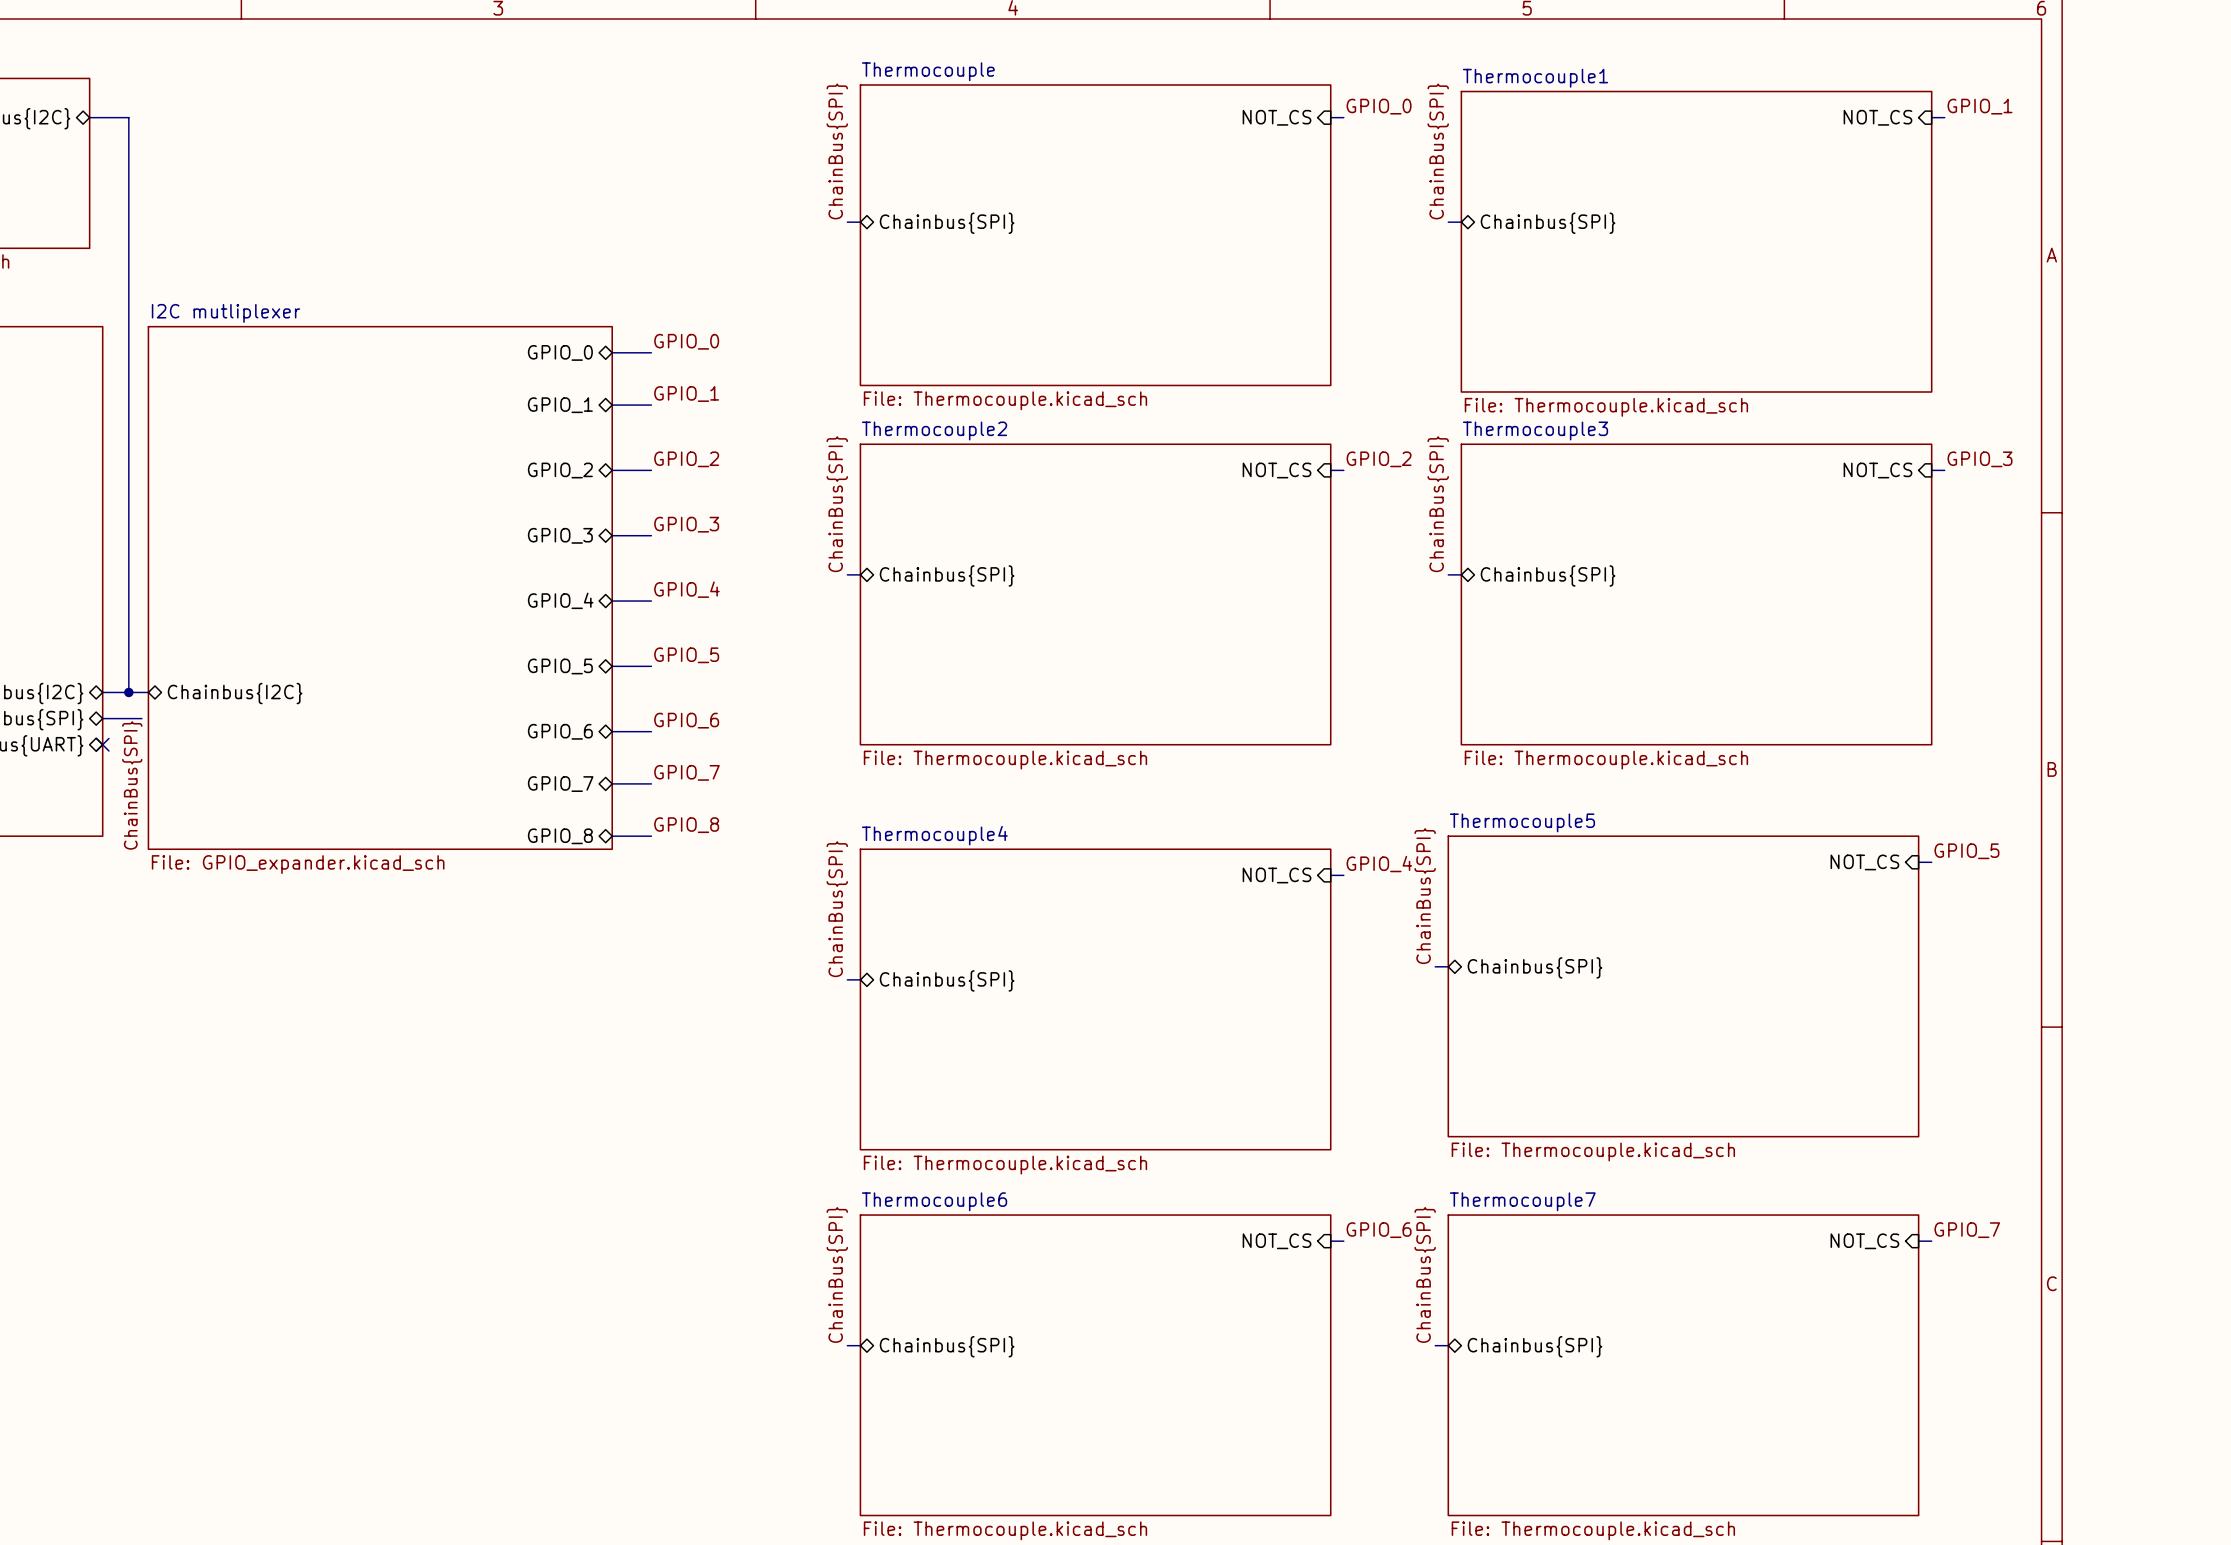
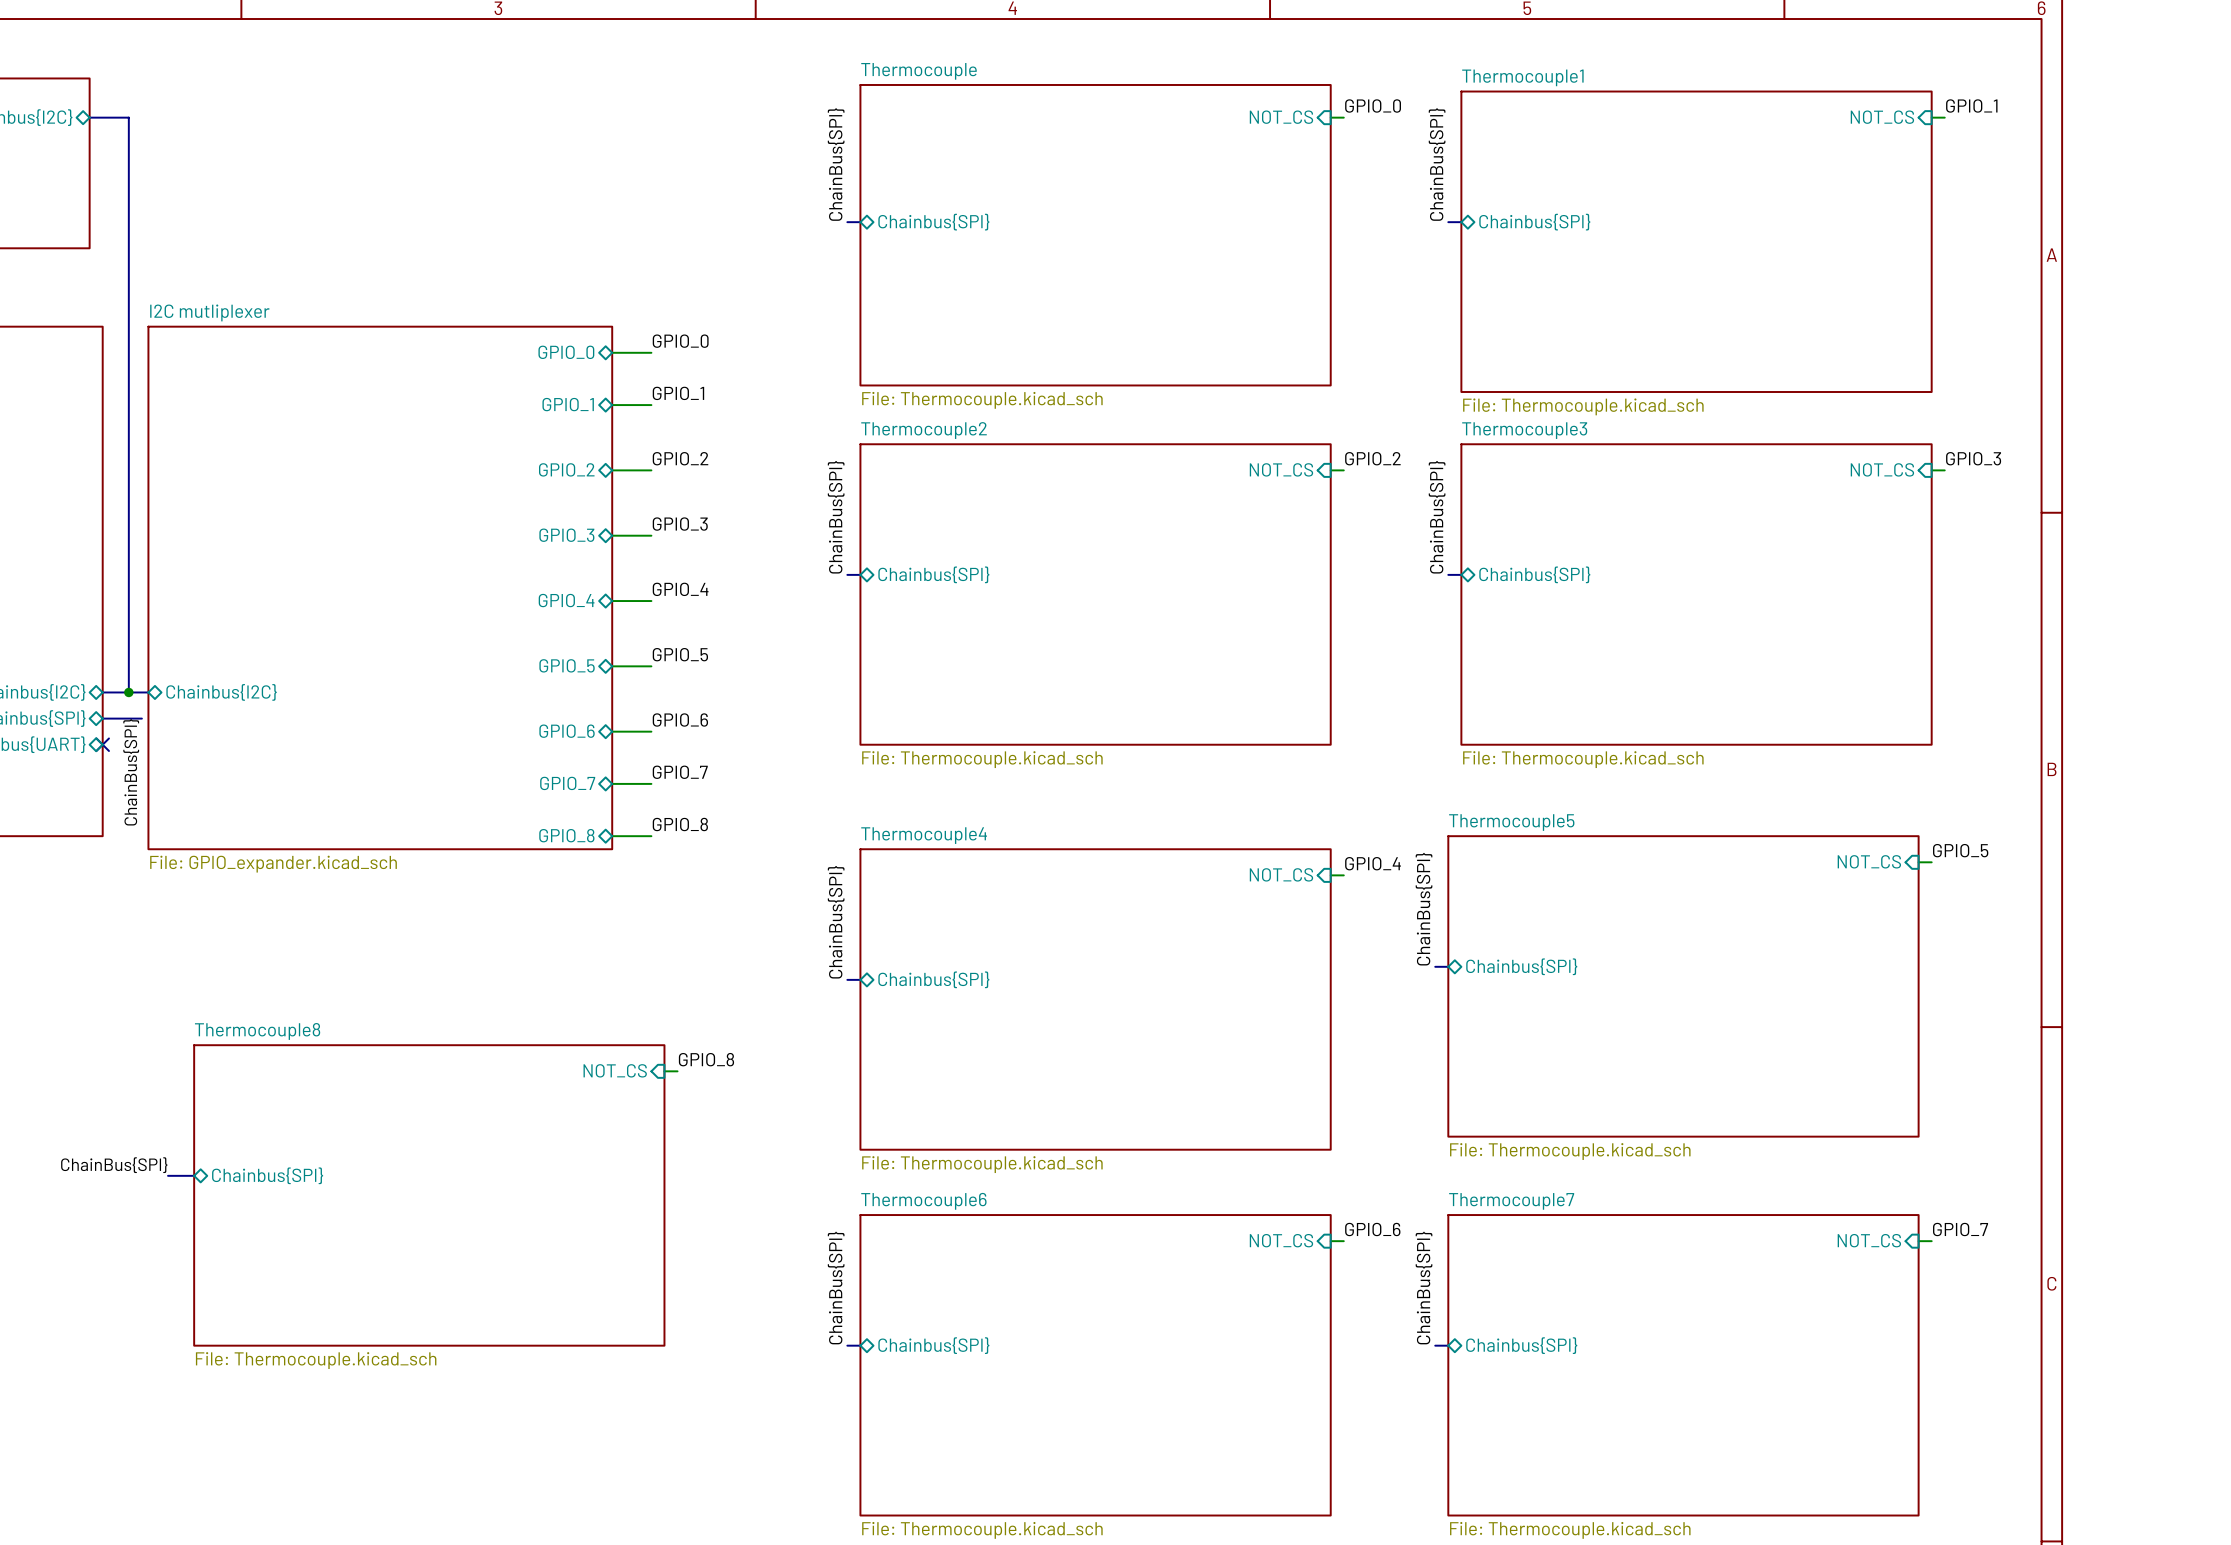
label: none -> GPIO_8 (706, 1059)
sheet pin: none -> NOT_CS (615, 1070)
wire: none -> (664, 1071) (677, 1071)
label: none -> ChainBus{SPI} (114, 1165)
bus: none -> (168, 1175) (194, 1175)
sheet pin: none -> Chainbus{SPI} (267, 1175)
sheet Thermocouple8: none -> File: Thermocouple.kicad_sch (429, 1195)

